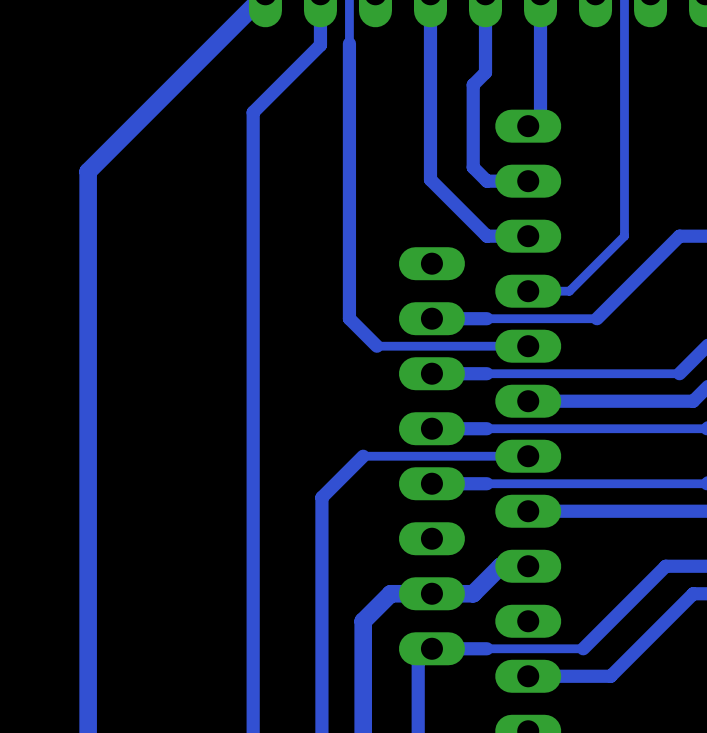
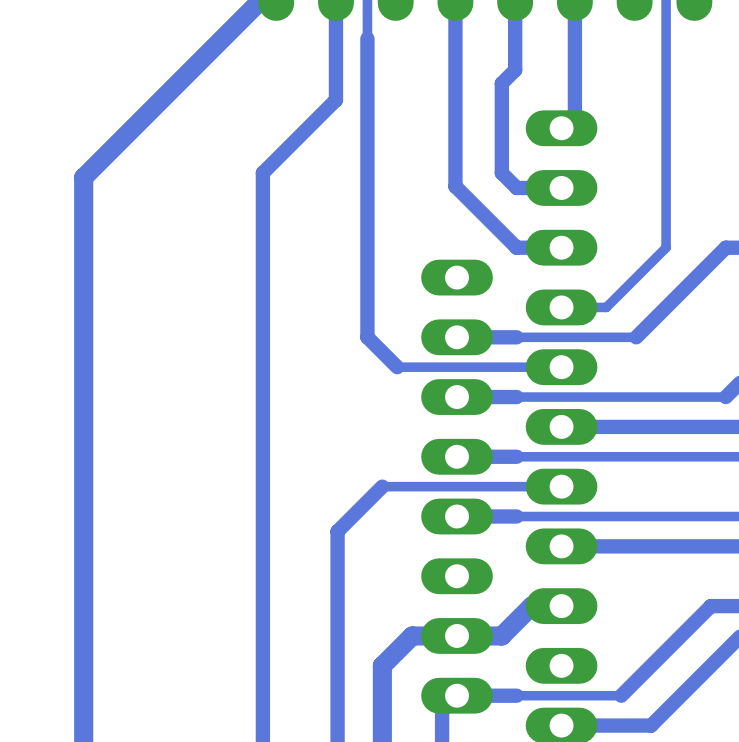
track: (320, 45) (253, 112) (253, 167) -> (335, 40) (335, 99) (262, 173)

